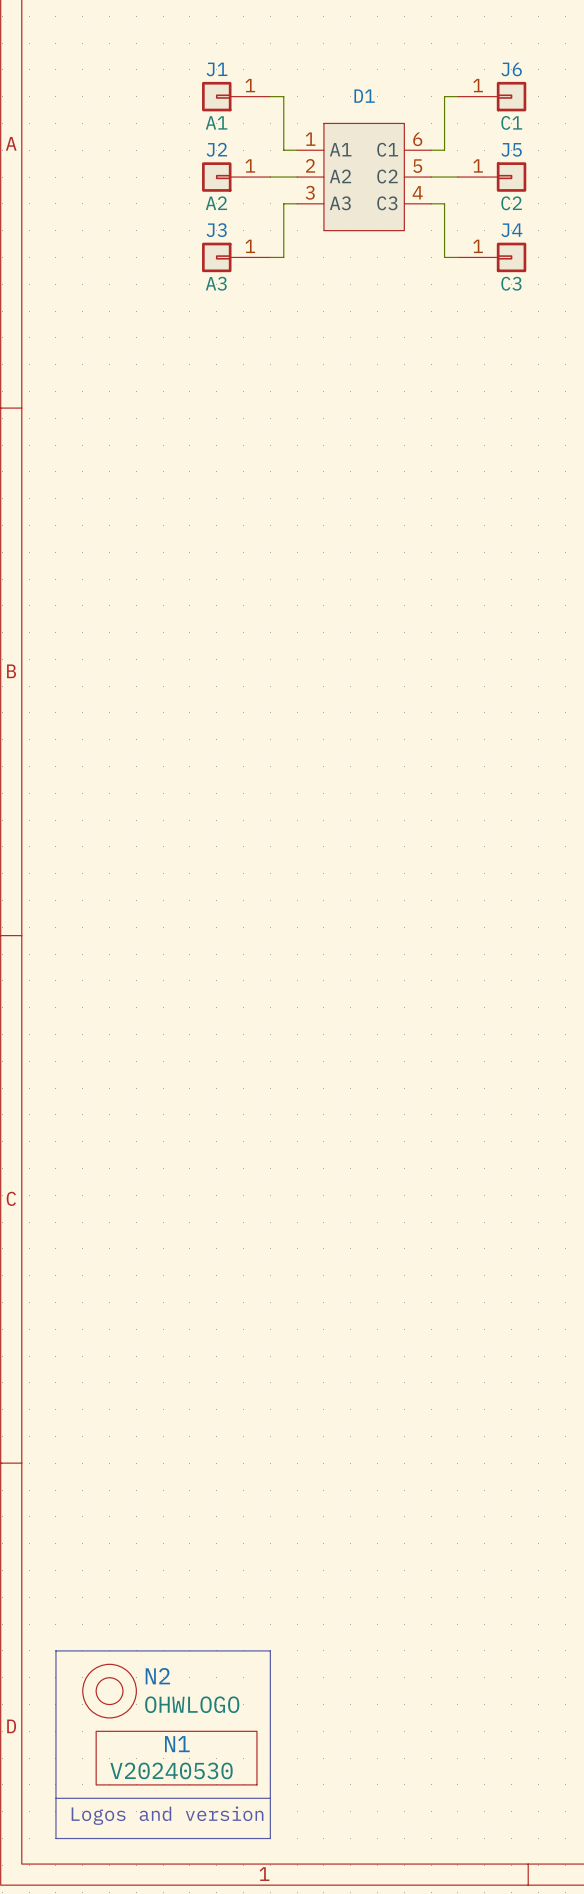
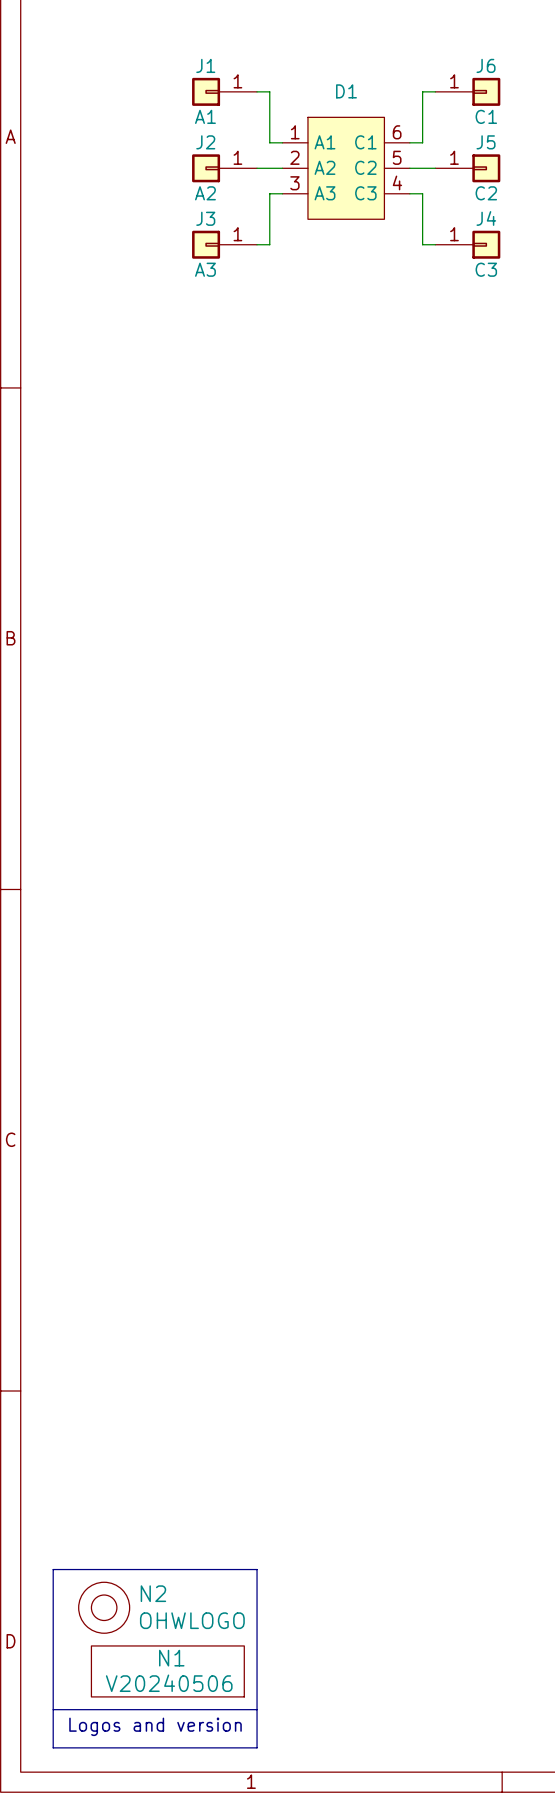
N1 value: V20240530 (171, 1770) -> V20240506 (169, 1683)

